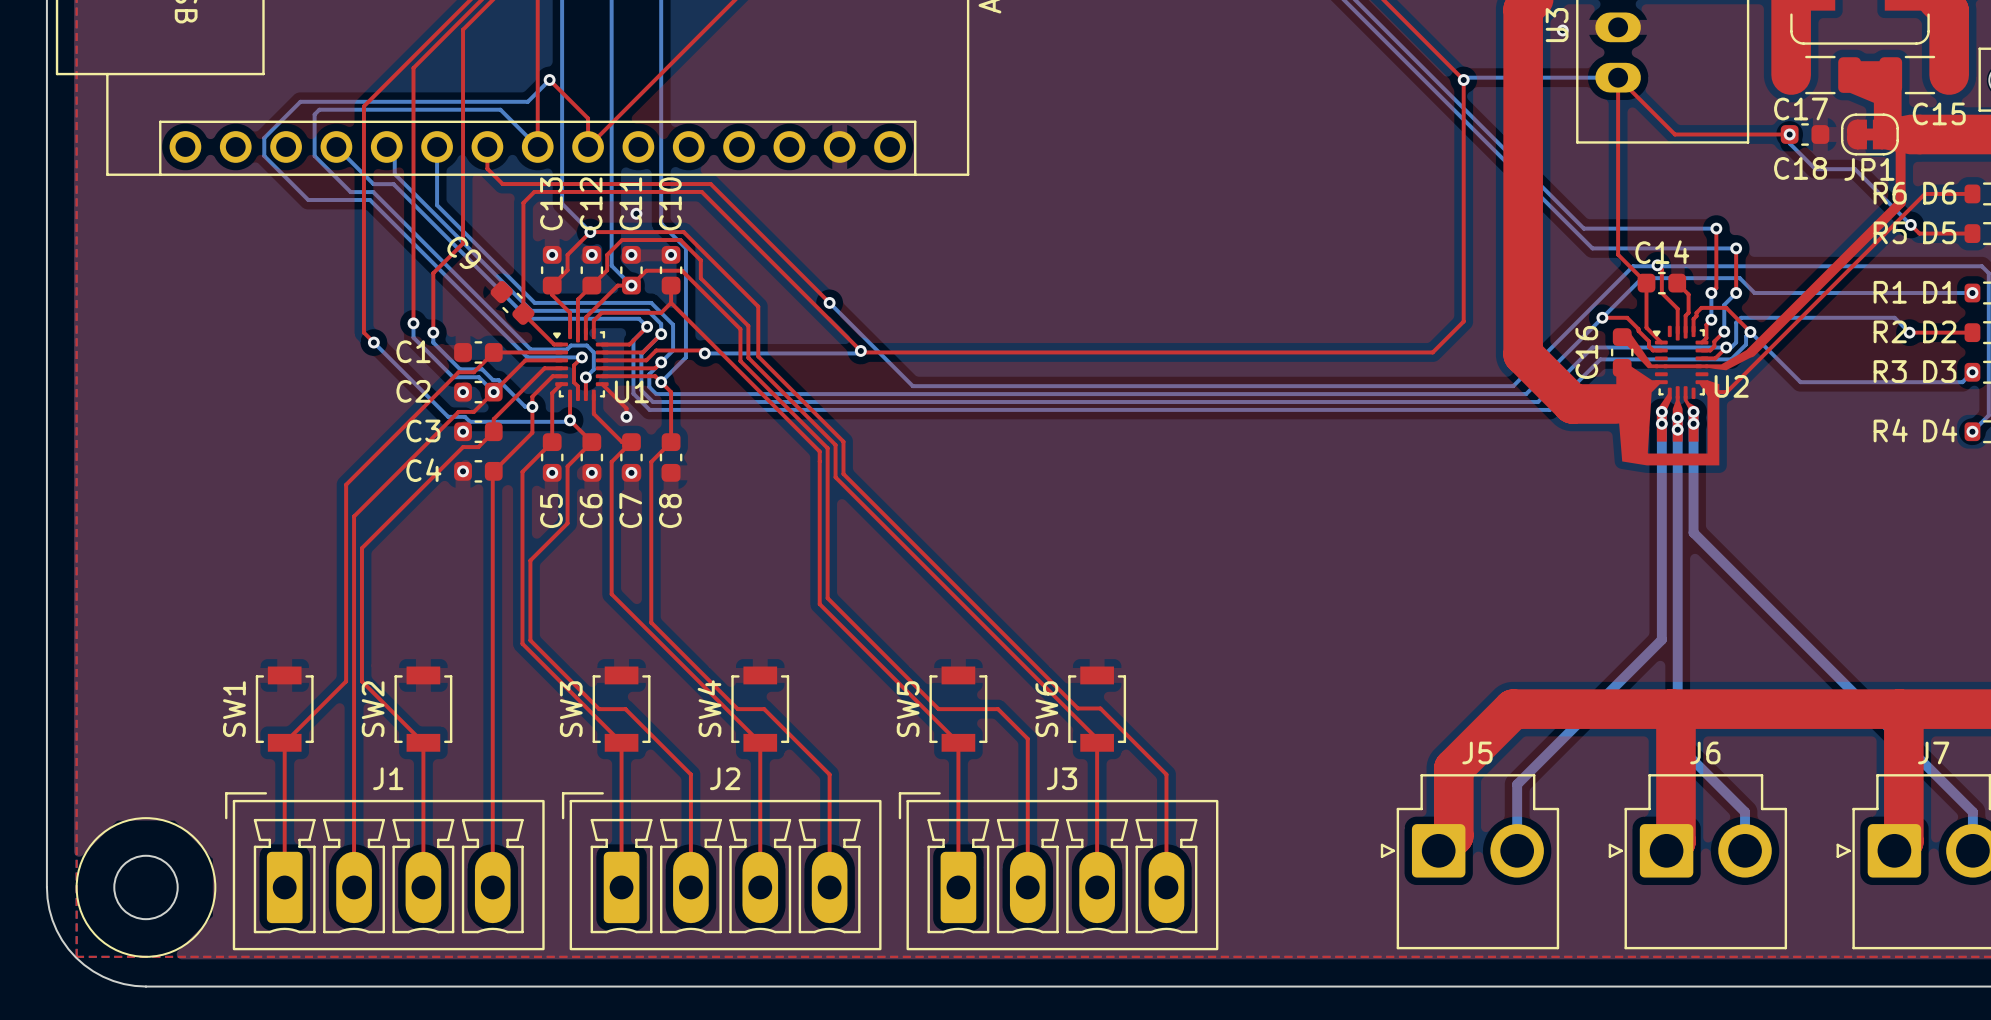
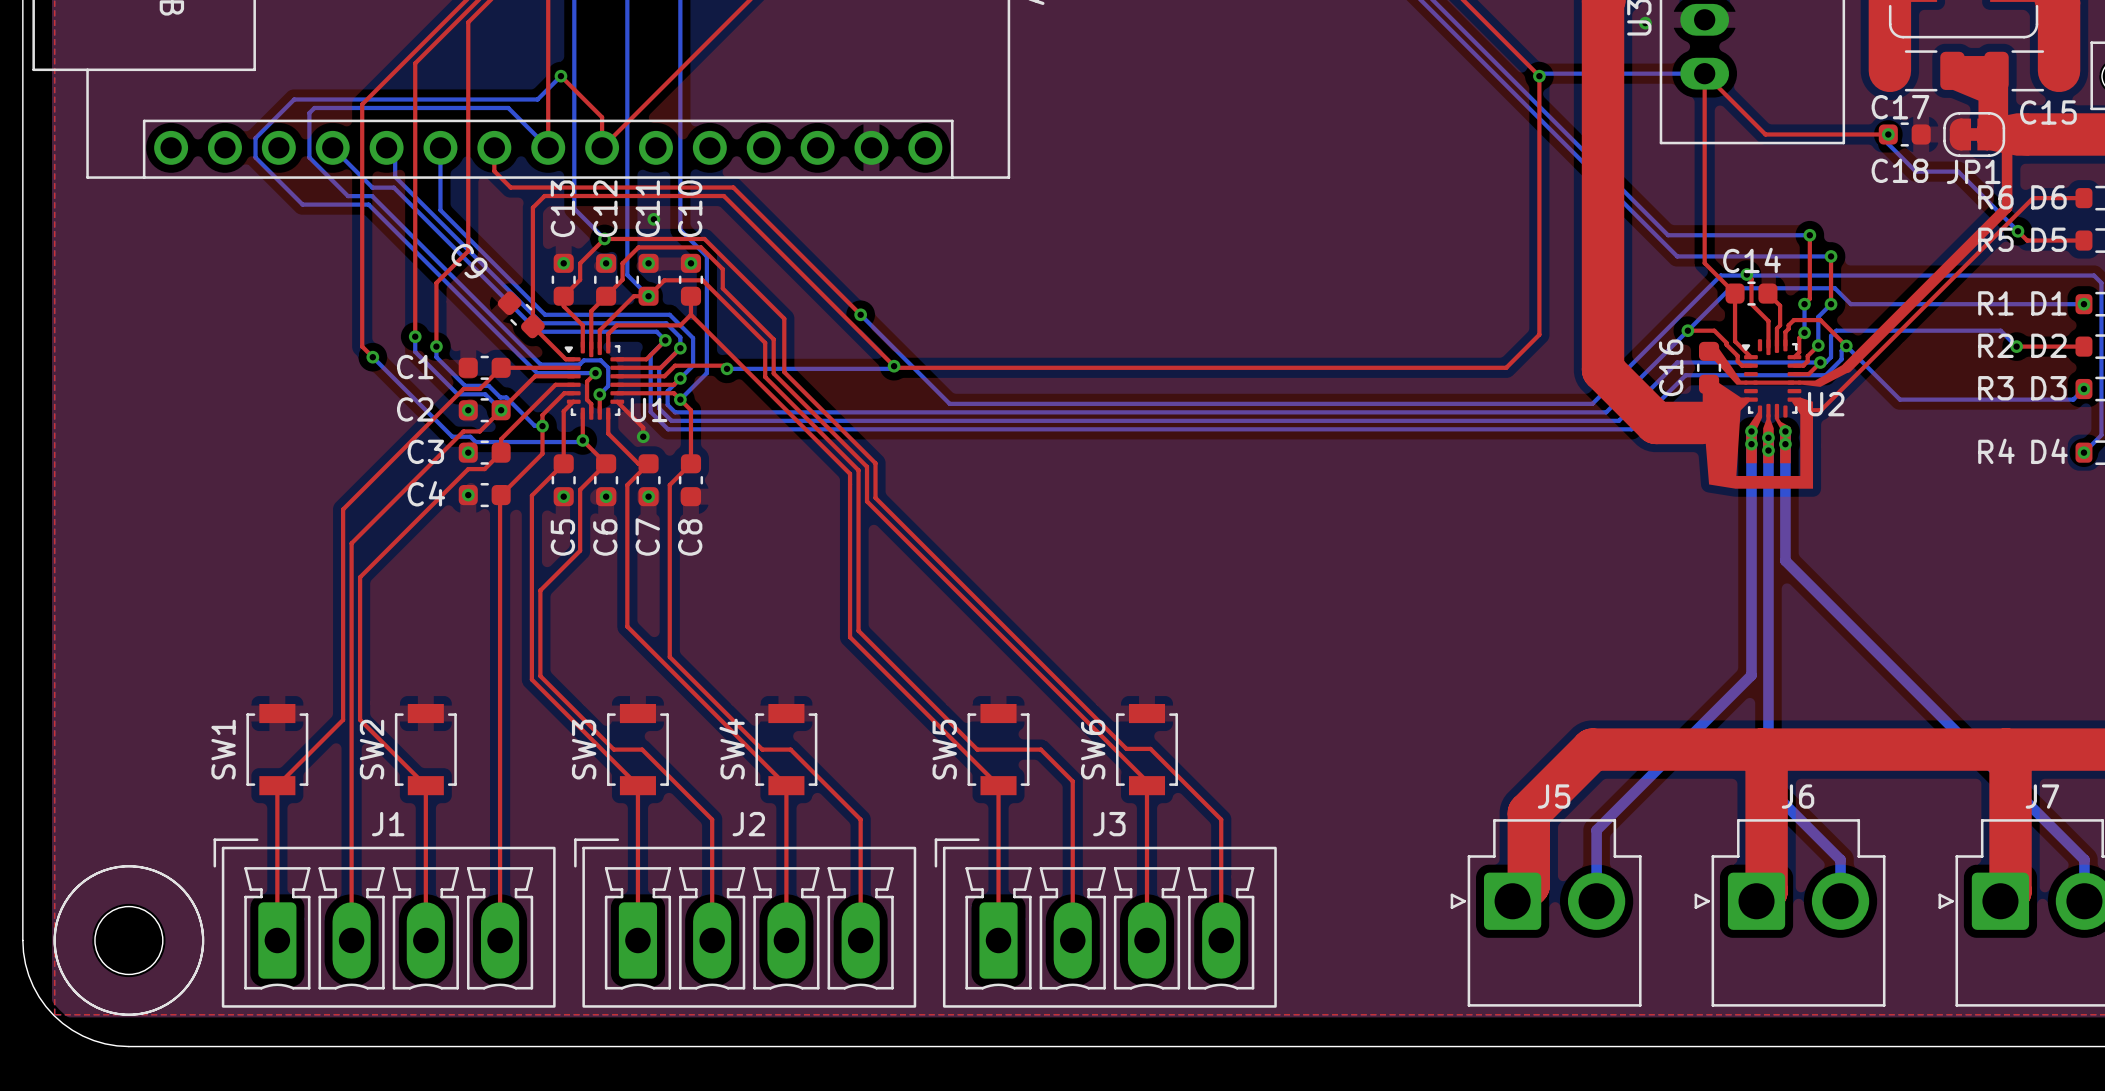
drawing: none -> [53, 865, 205, 1016]

